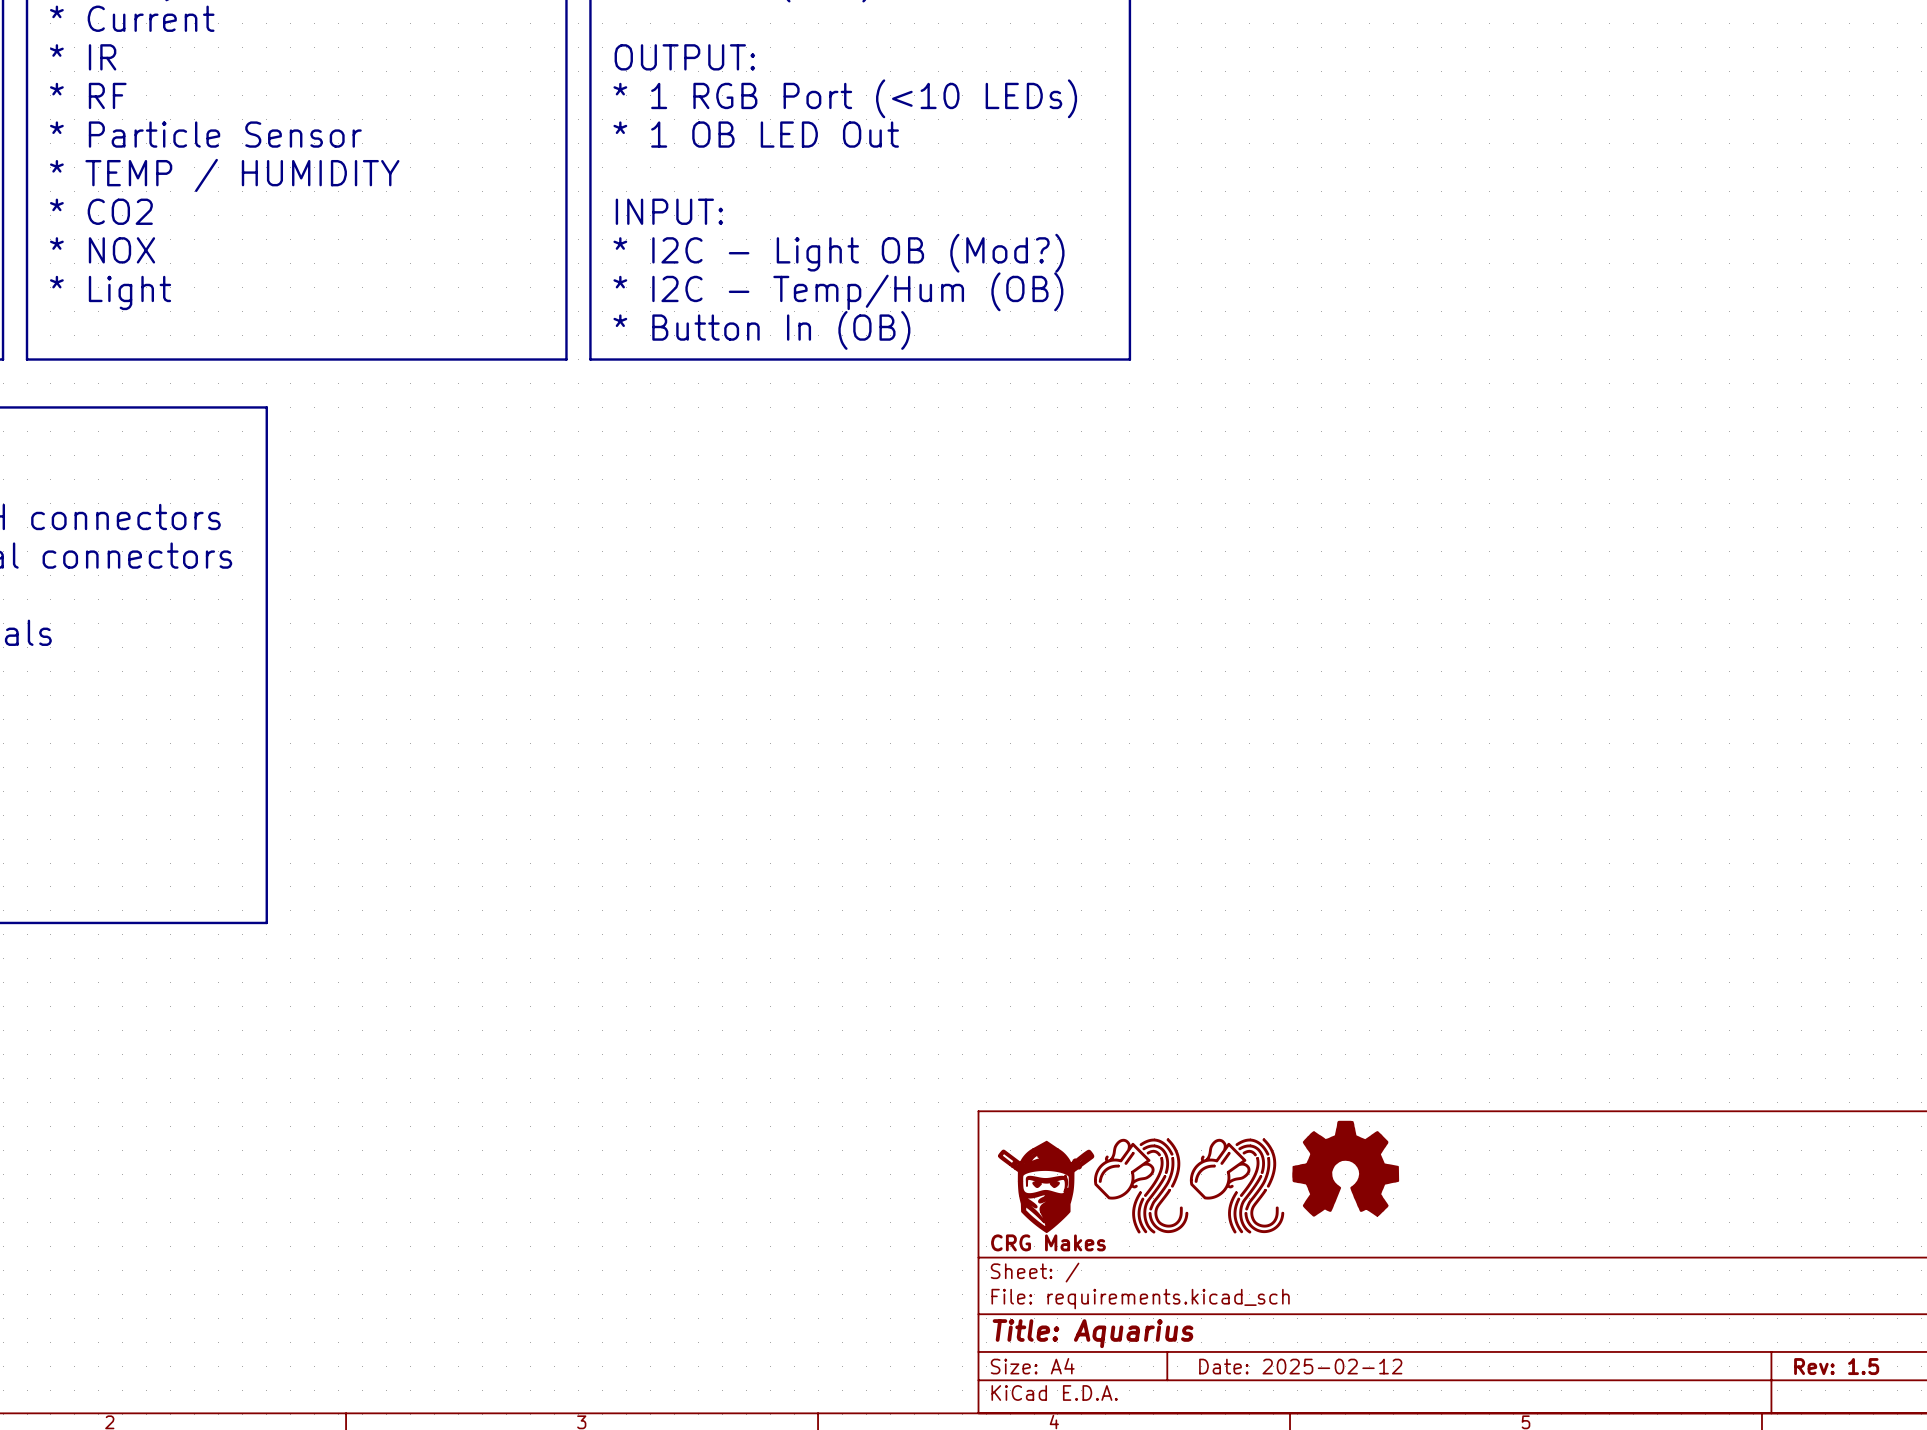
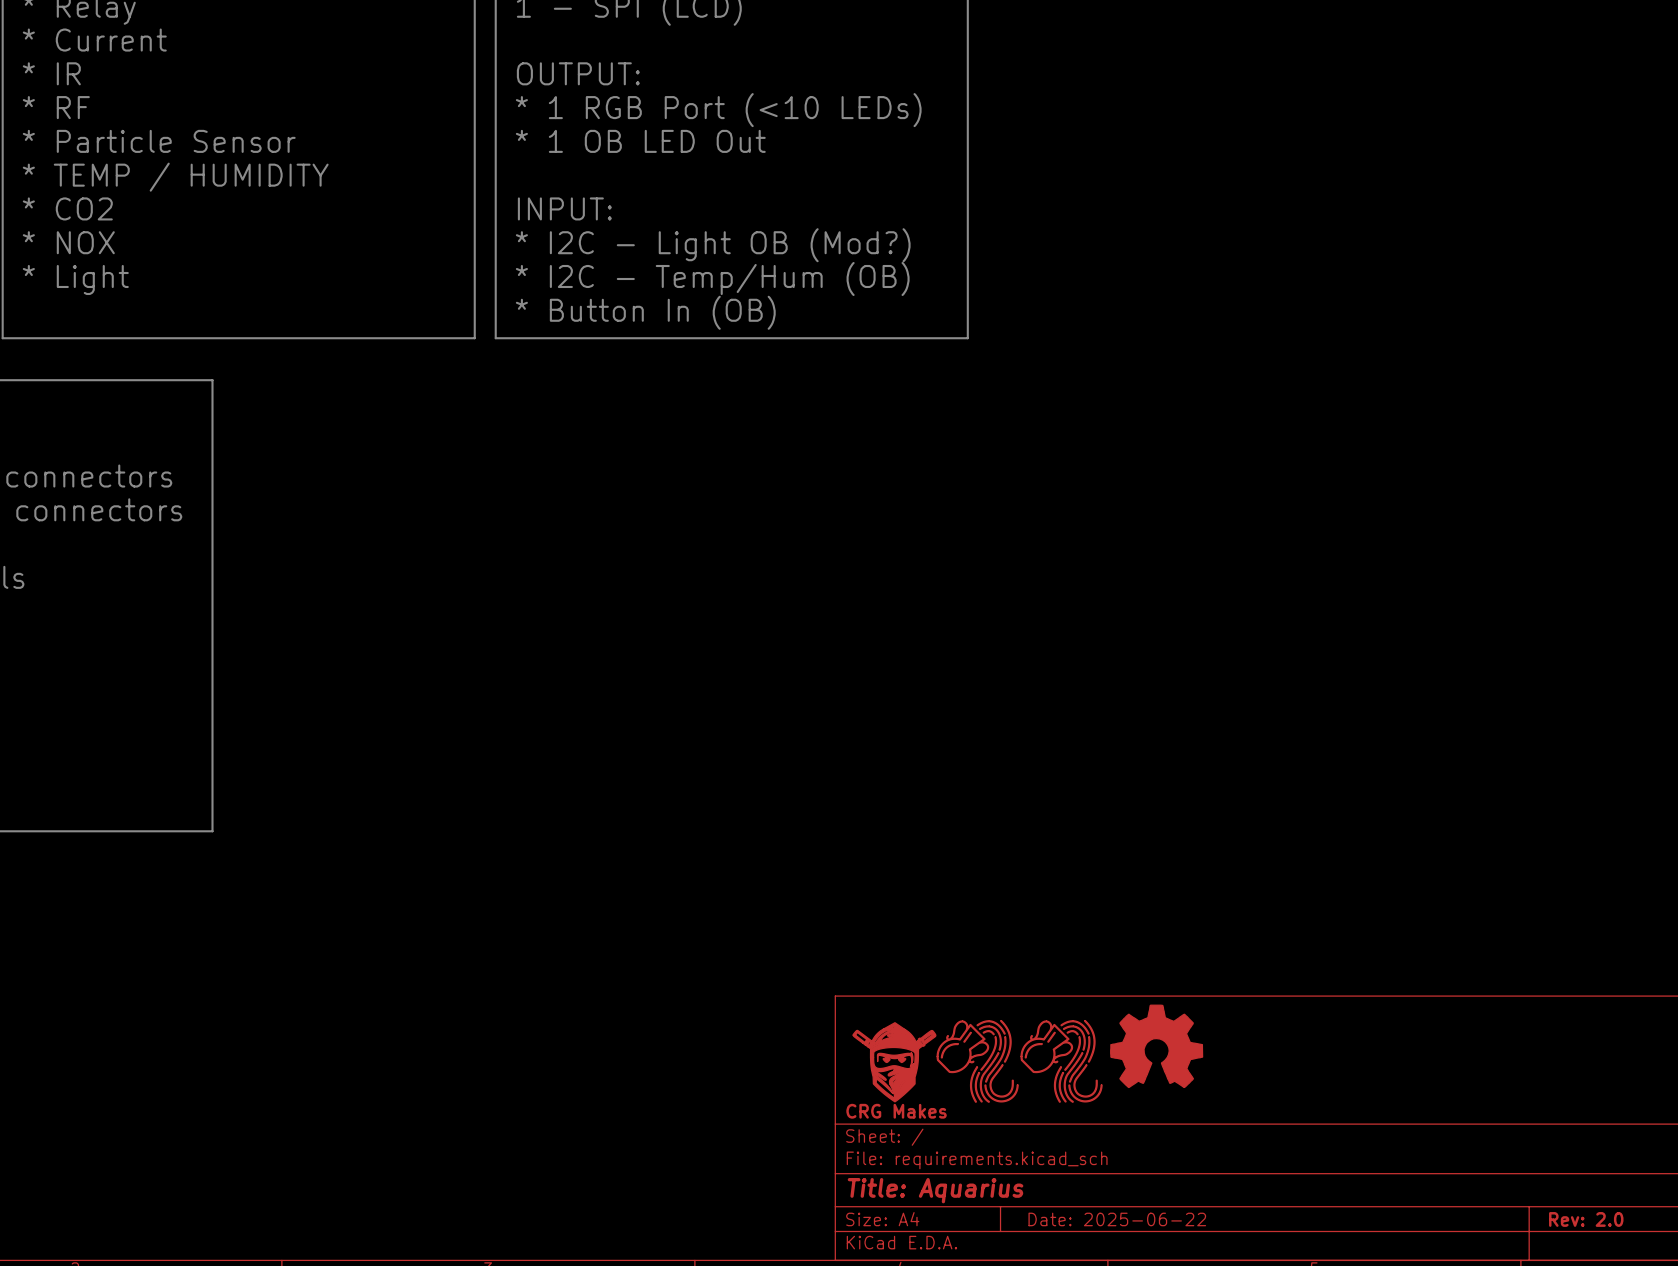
title block: Date: 2025-02-12 (1300, 1366) -> Date: 2025-06-22 (1117, 1219)
title block: Rev: 1.5 (1836, 1366) -> Rev: 2.0 (1586, 1219)

